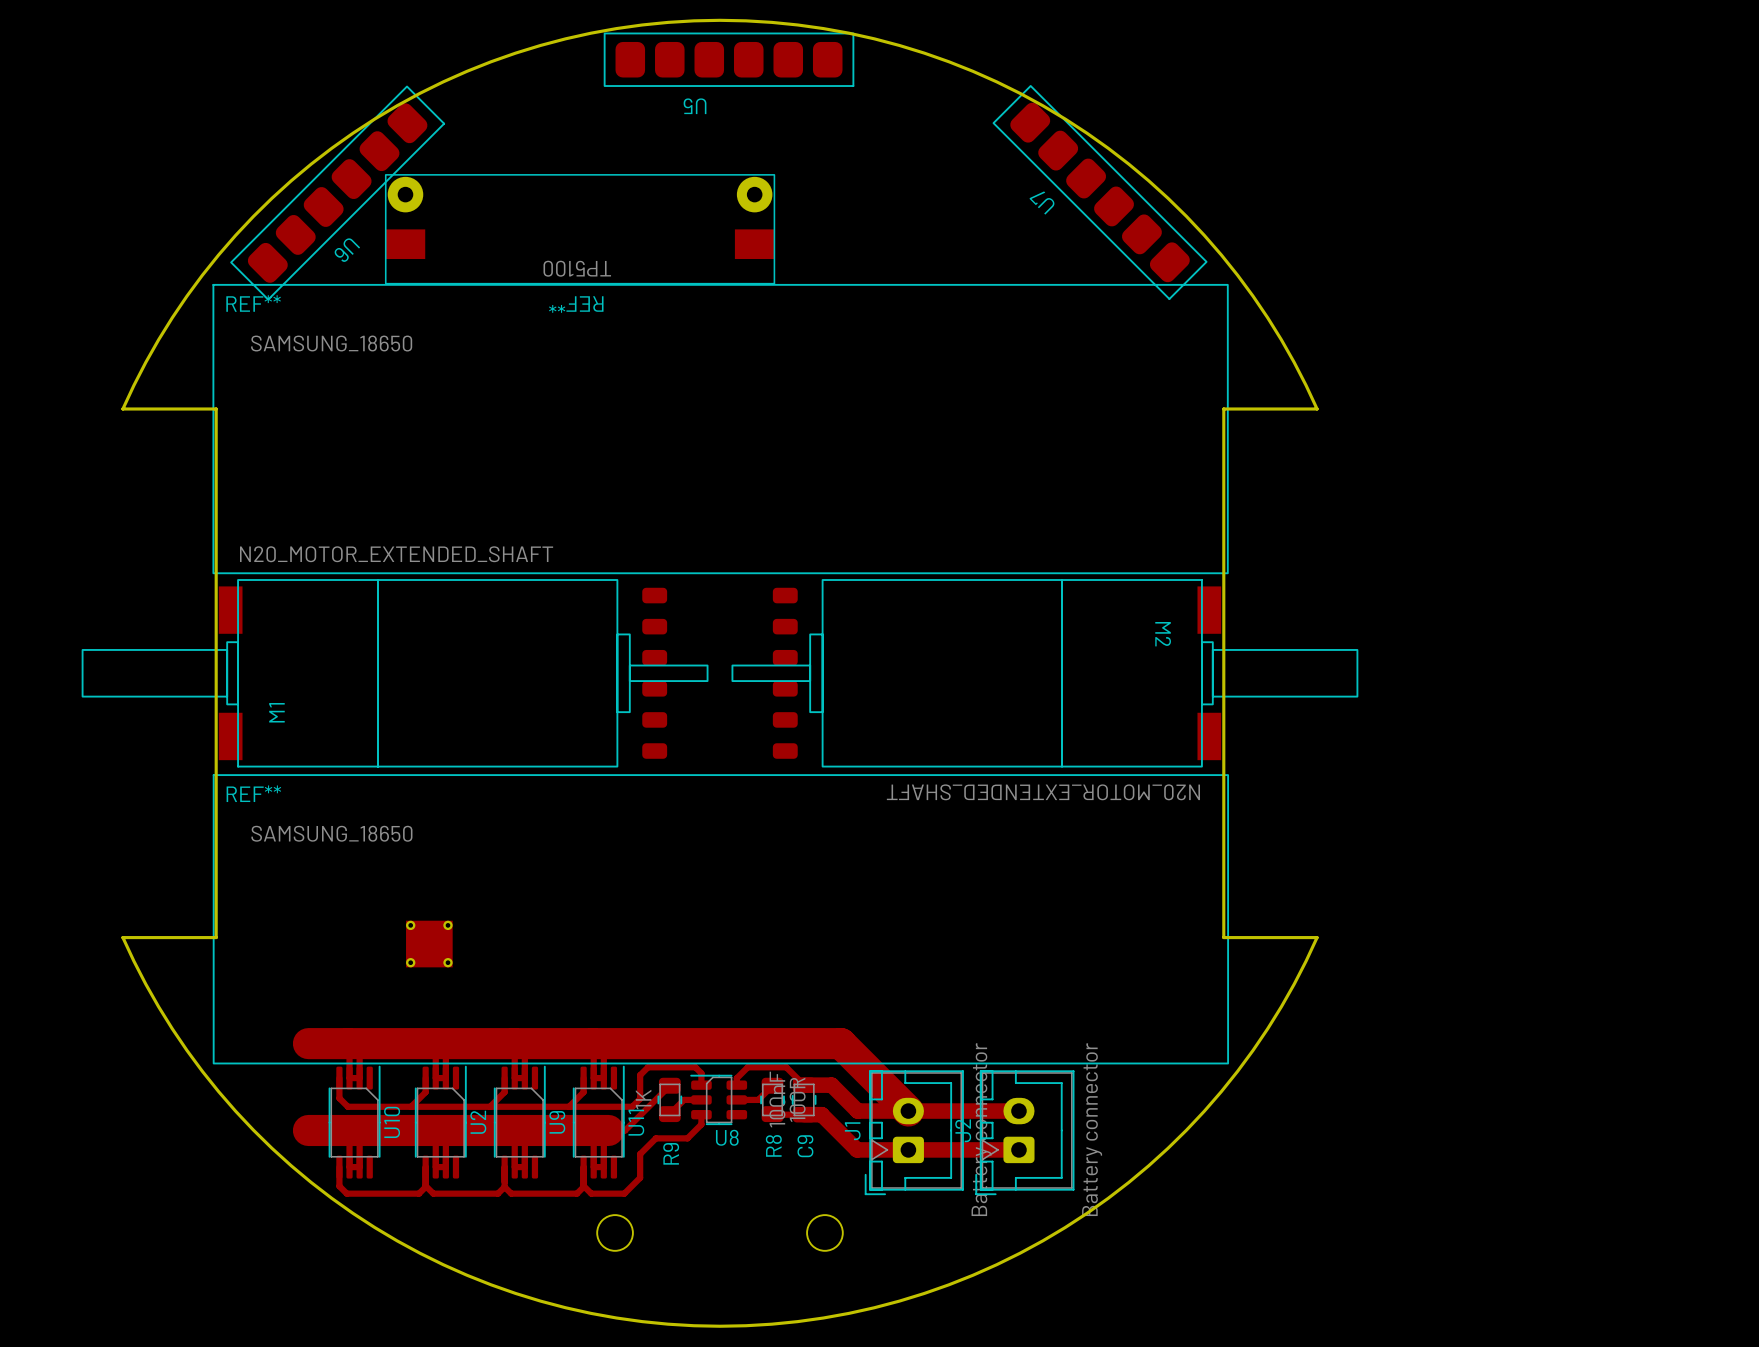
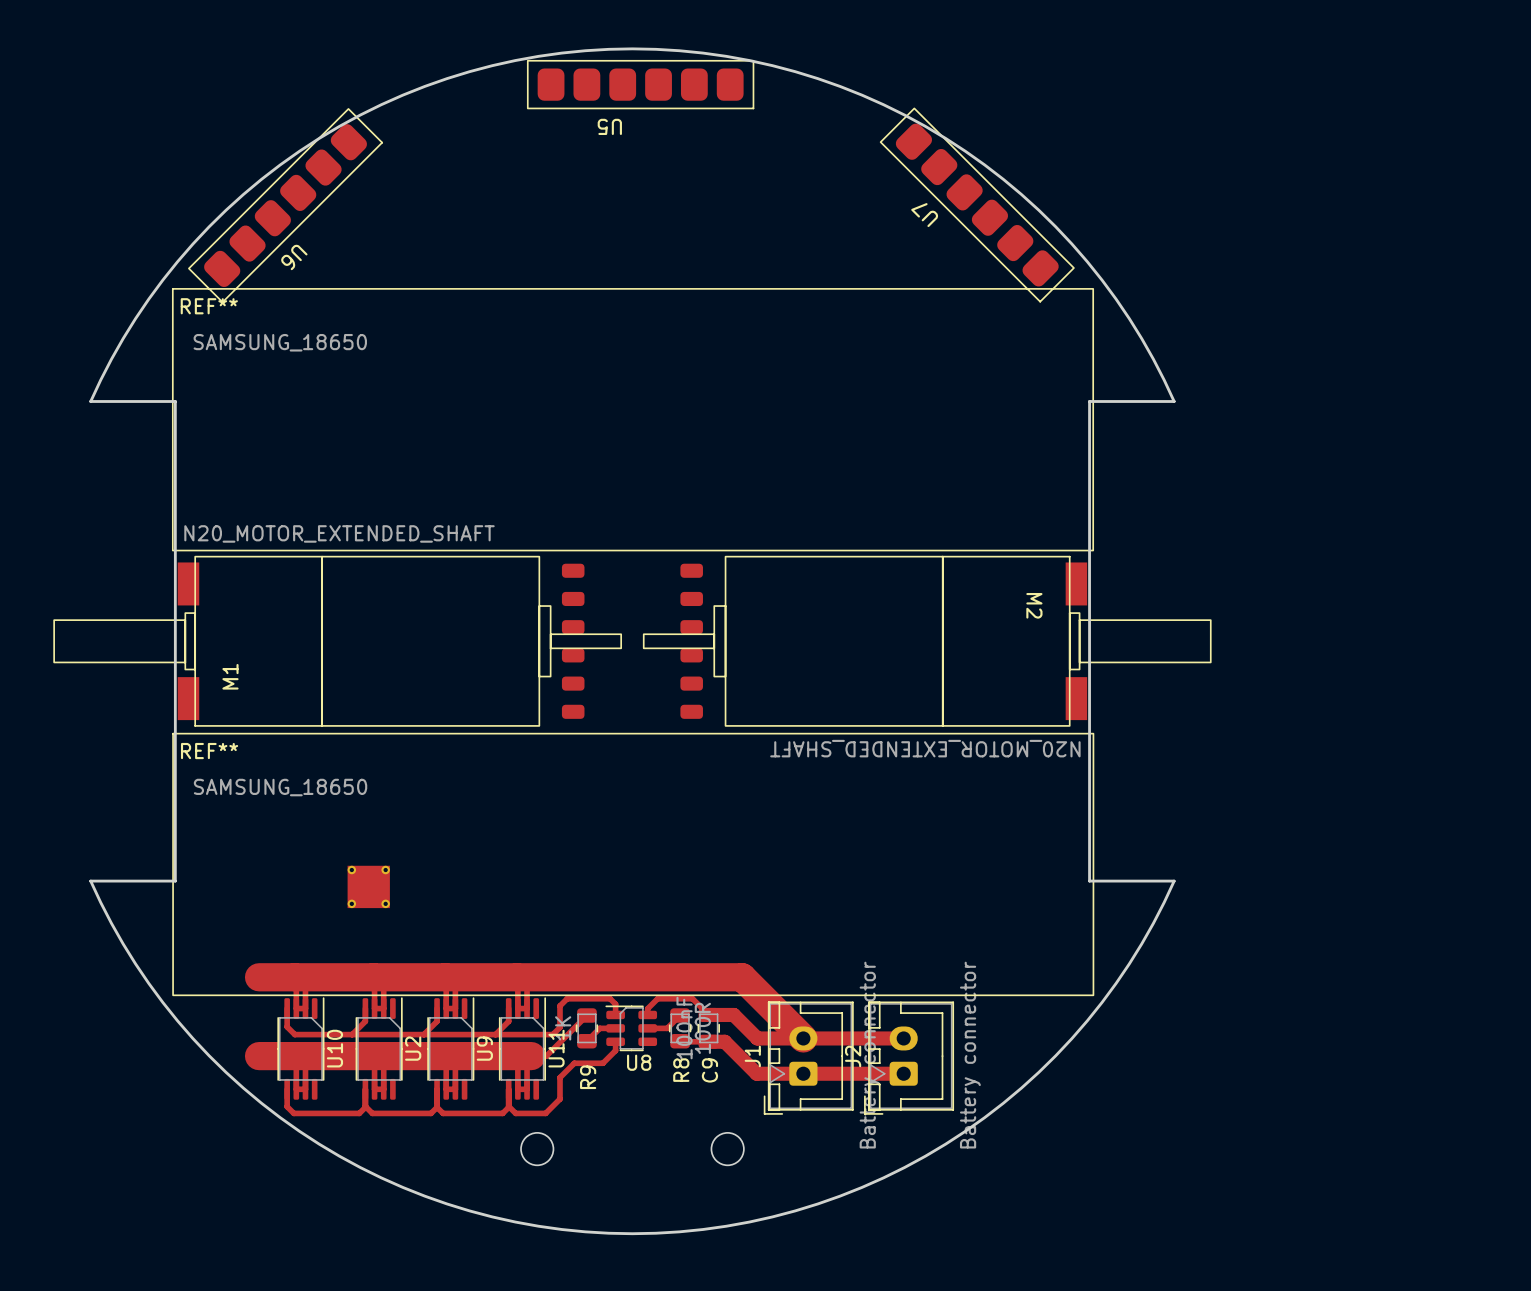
REF**: TP5100 (580, 229) -> none

